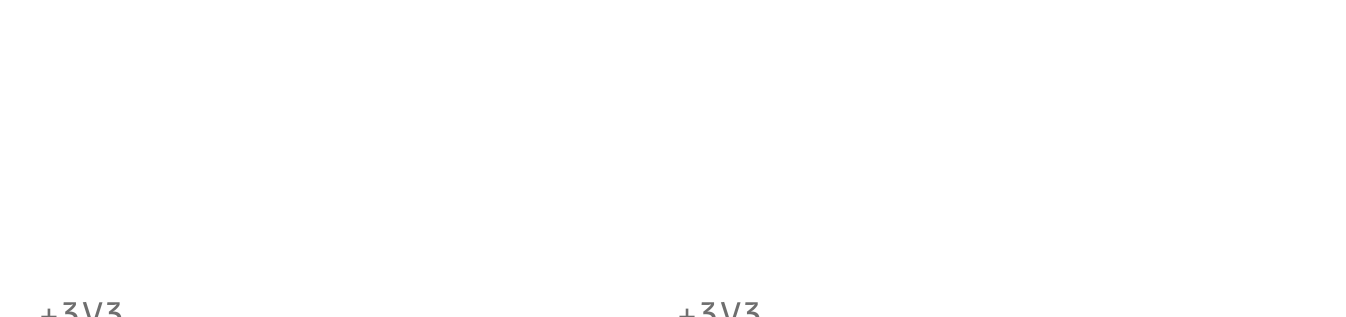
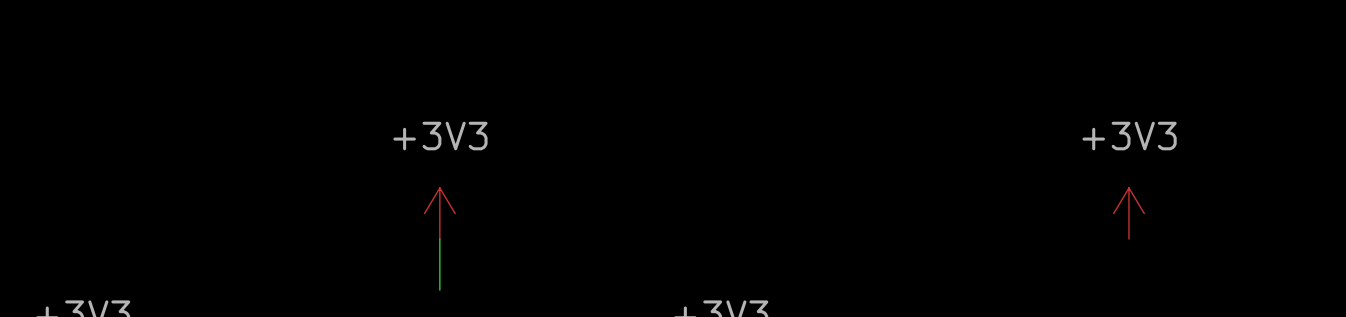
power symbol: none -> +3V3 (439, 213)
power symbol: none -> +3V3 (1128, 213)
wire: none -> (439, 239) (439, 290)

